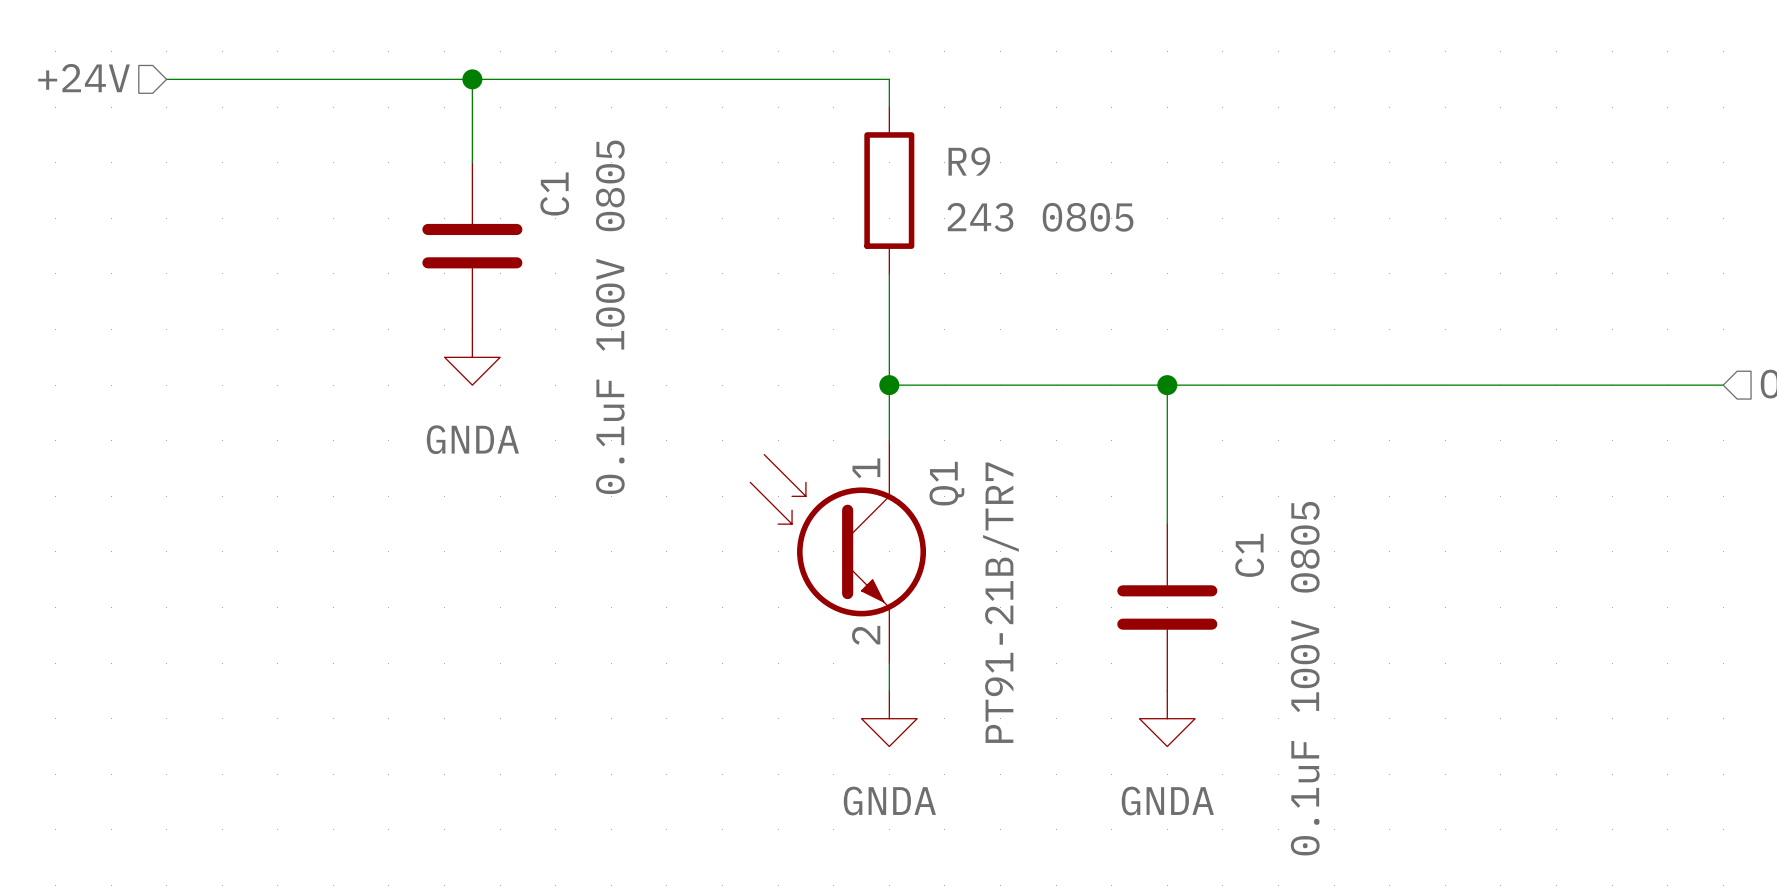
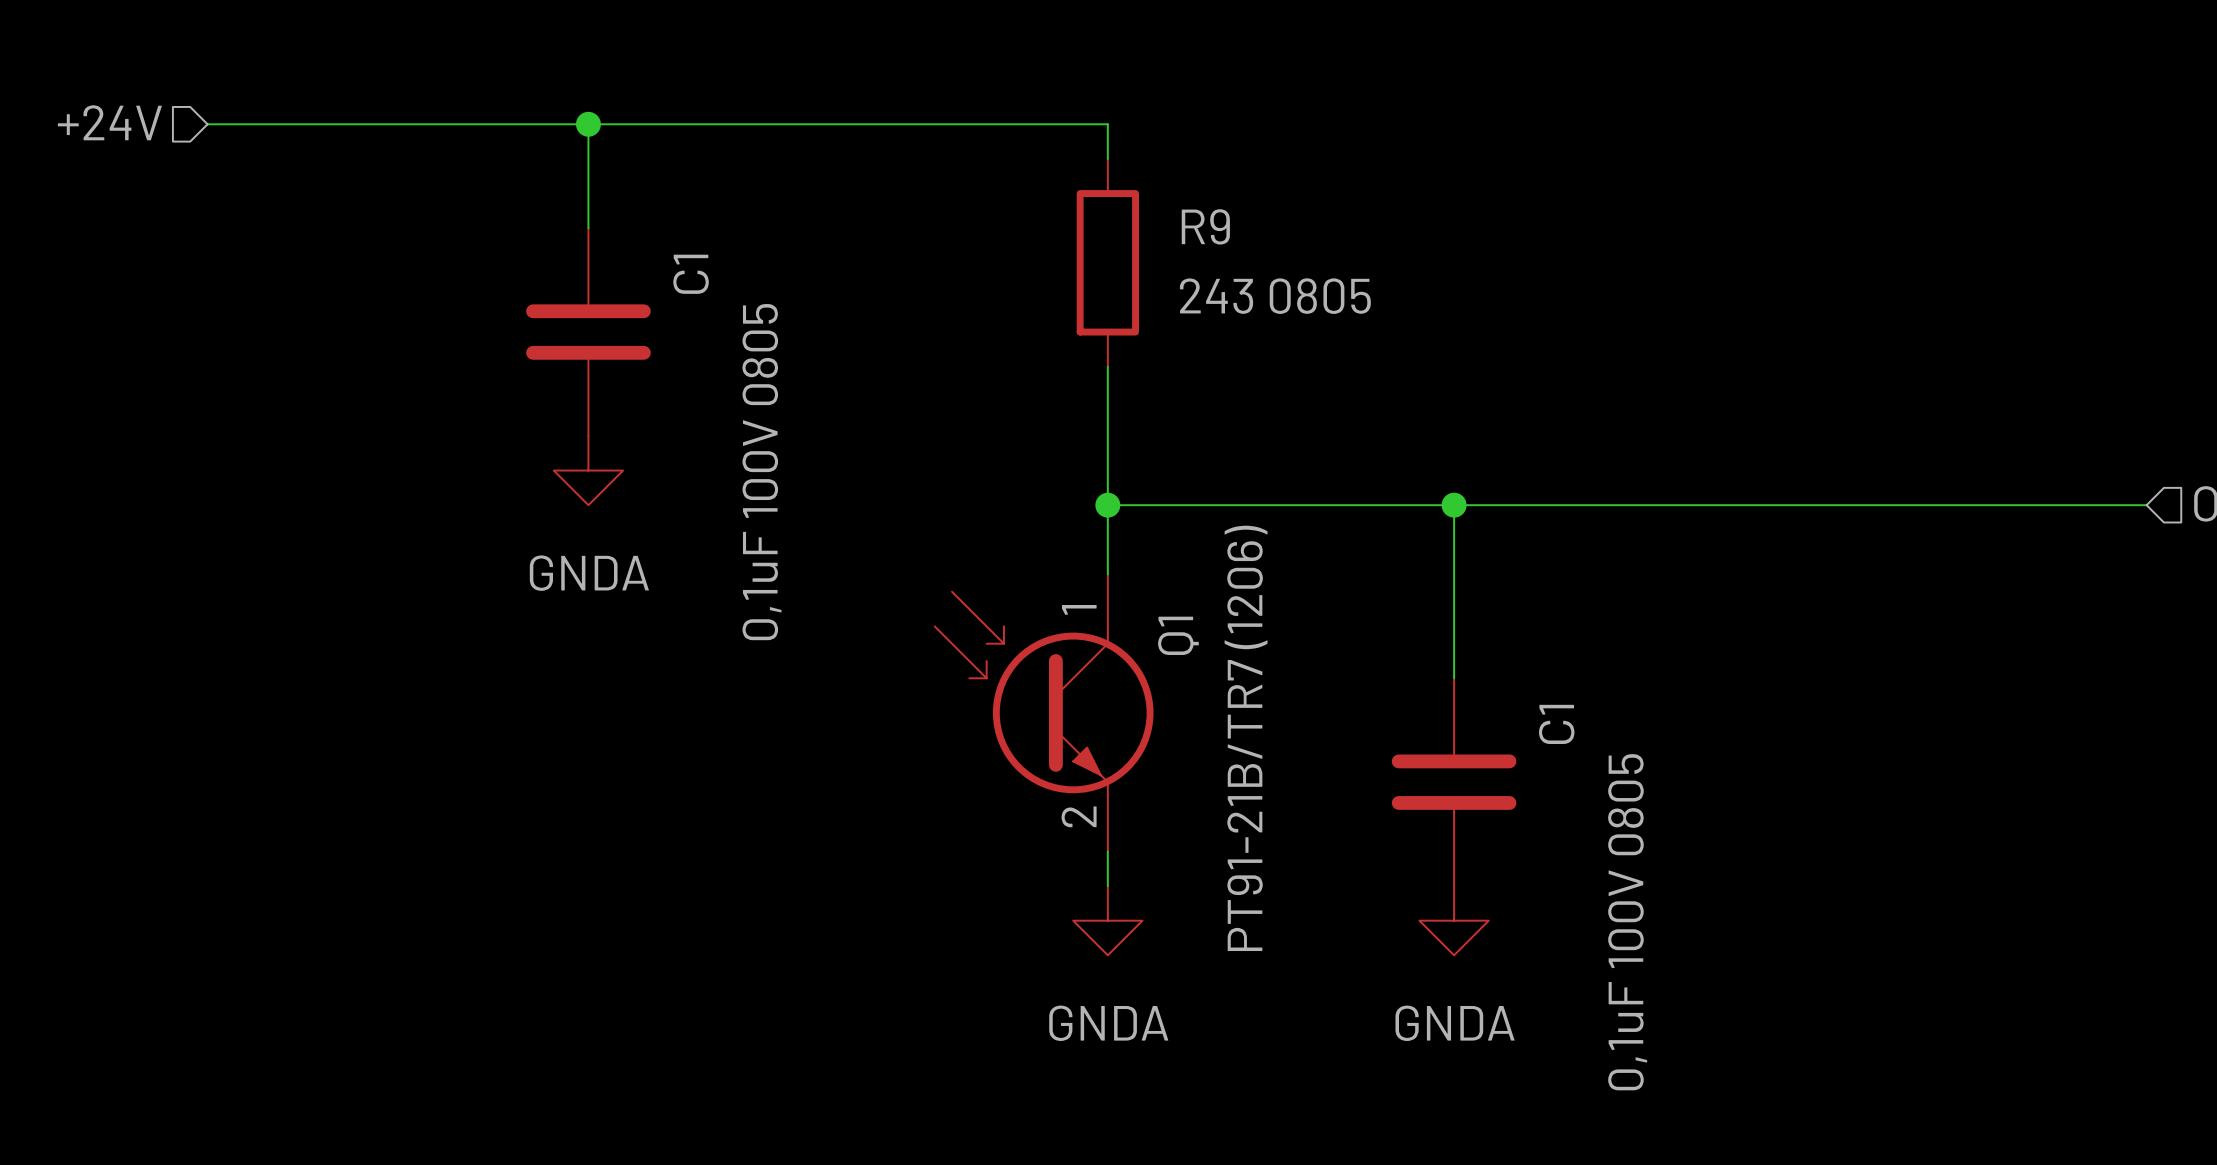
C1 value: 0.1uF 100V 0805 (610, 317) -> 0,1uF 100V 0805 (761, 472)
Q1 value: PT91-21B/TR7 (1000, 602) -> PT91-21B/TR7 (1206) (1246, 738)
C1 value: 0.1uF 100V 0805 (1305, 678) -> 0,1uF 100V 0805 (1627, 922)

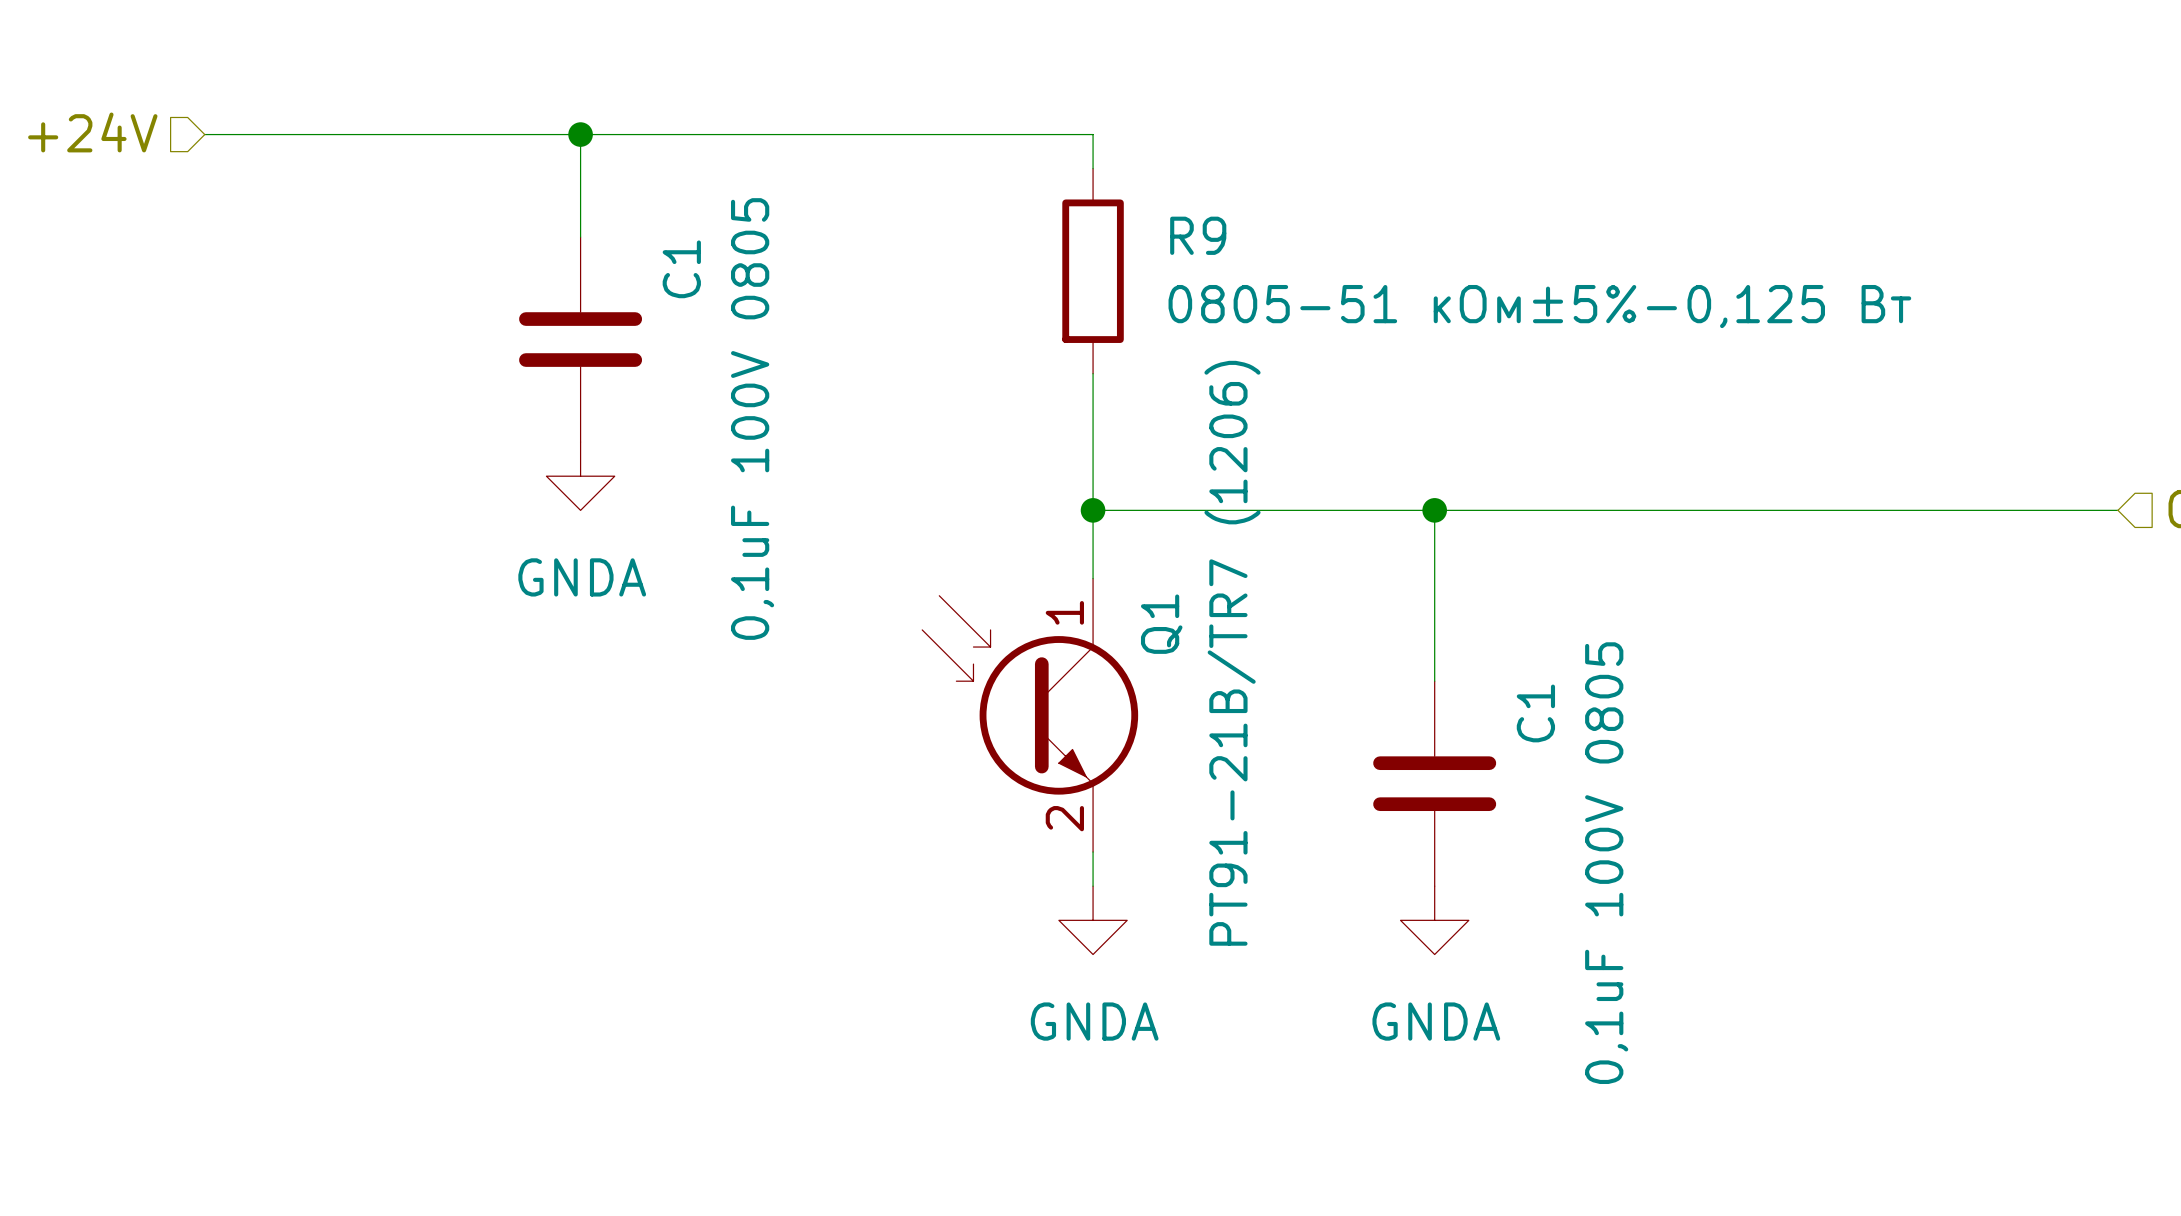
R9 value: 243 0805 (1275, 296) -> 0805-51 кОм±5%-0,125 Вт (1539, 306)

